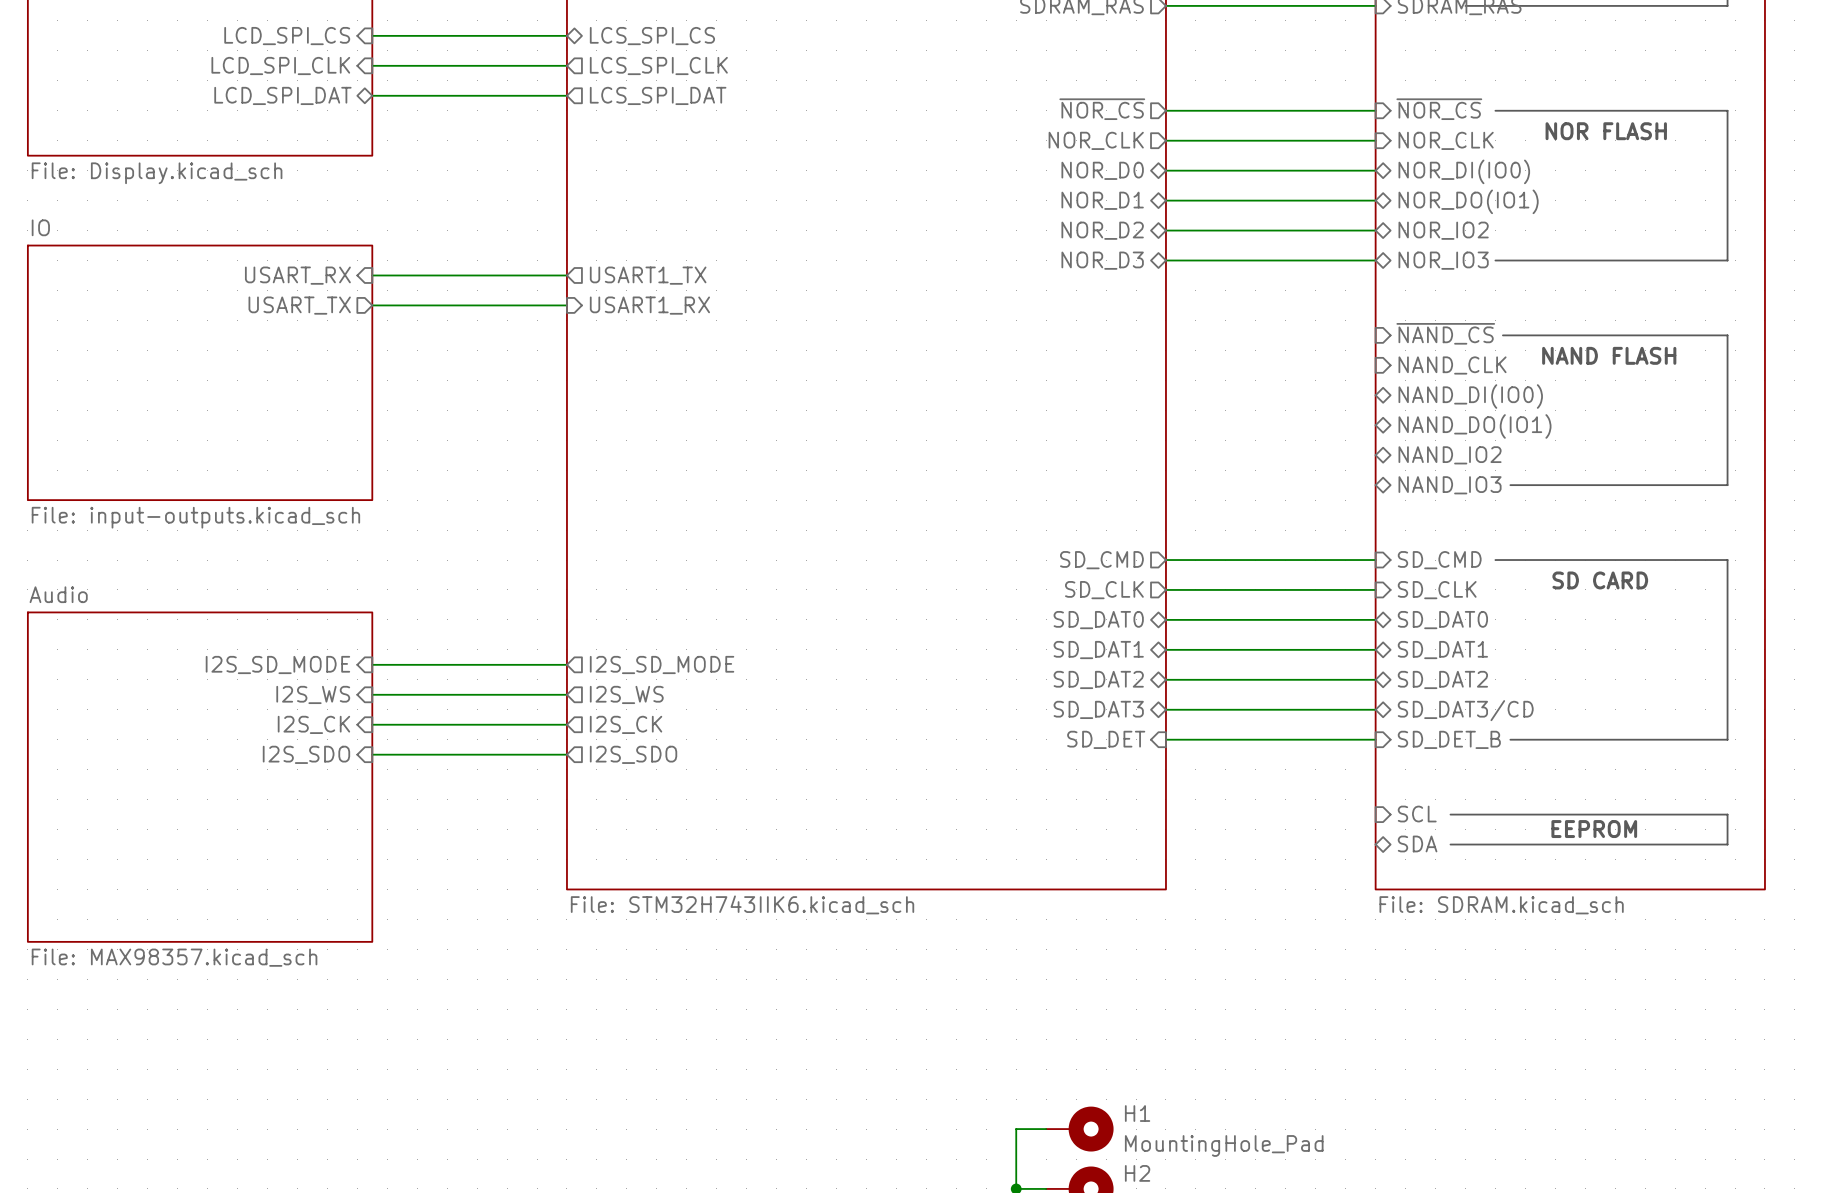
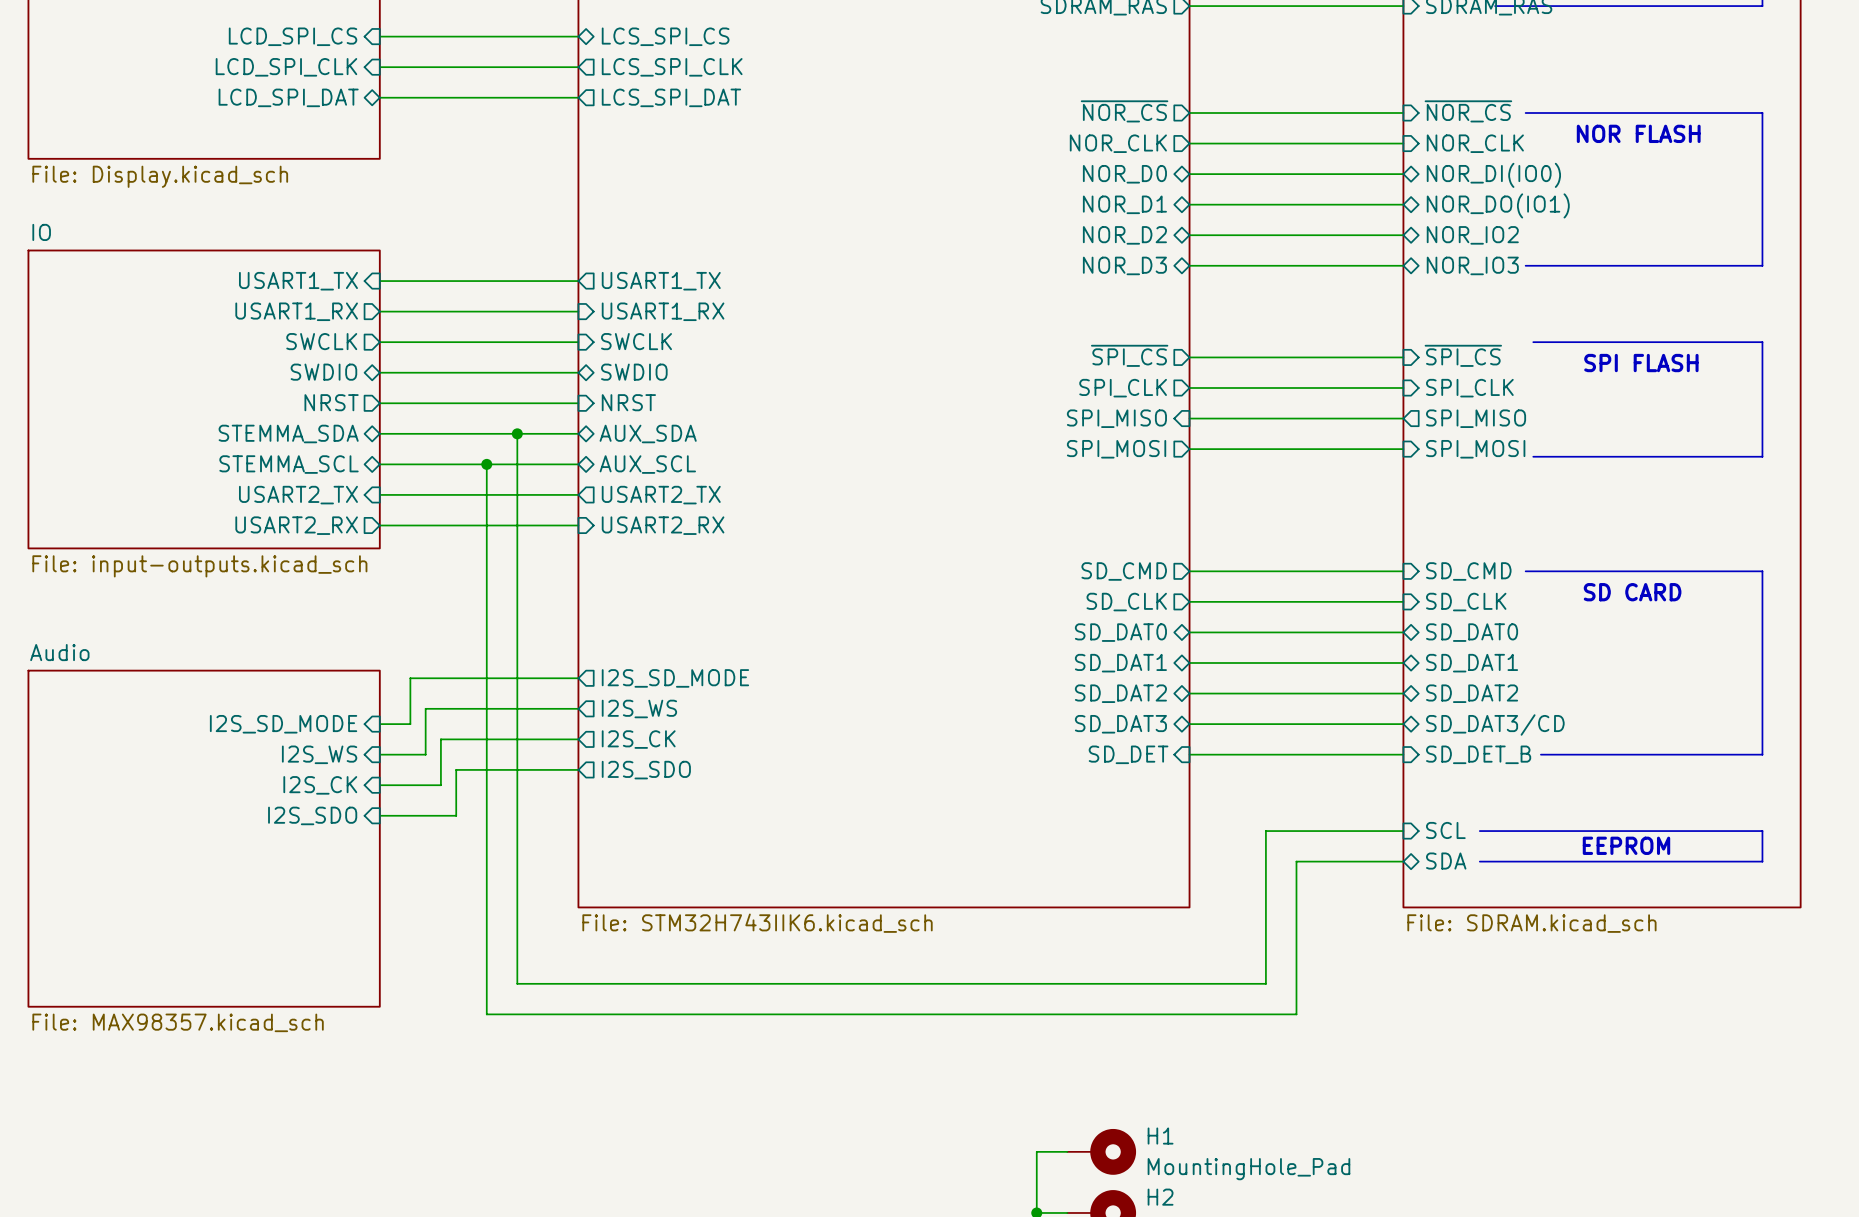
sheet pin: USART_RX (297, 275) -> USART1_TX (298, 281)
sheet pin: USART_TX (299, 305) -> USART1_RX (296, 311)
sheet pin: ~{NAND_CS} (1445, 333) -> ~{SPI_CS} (1463, 355)
sheet pin: none -> SWCLK (321, 341)
sheet pin: none -> SWCLK (636, 341)
wire: none -> (379, 342) (578, 342)
sheet pin: none -> ~{SPI_CS} (1129, 355)
wire: none -> (1189, 357) (1403, 357)
text: NAND FLASH (1609, 355) -> SPI FLASH (1641, 363)
sheet pin: none -> SWDIO (323, 372)
sheet pin: none -> SWDIO (634, 372)
wire: none -> (379, 372) (578, 372)
sheet pin: NAND_CLK (1452, 365) -> none
sheet IO: File: input-outputs.kicad_sch (200, 372) -> none
sheet pin: none -> SPI_CLK (1123, 388)
wire: none -> (1189, 387) (1403, 387)
sheet pin: none -> SPI_CLK (1469, 388)
sheet IO: none -> File: input-outputs.kicad_sch (204, 399)
sheet pin: none -> NRST (331, 402)
sheet pin: none -> NRST (628, 402)
wire: none -> (379, 403) (578, 403)
sheet pin: NAND_DI(IO0) (1470, 396) -> none
sheet pin: none -> SPI_MISO (1116, 418)
wire: none -> (1189, 418) (1403, 418)
sheet pin: none -> SPI_MISO (1476, 418)
sheet pin: none -> STEMMA_SDA (288, 433)
wire: none -> (379, 433) (578, 433)
wire: none -> (517, 433) (517, 983) (1265, 983) (1265, 831) (1403, 831)
junction: none -> (517, 433)
sheet pin: none -> AUX_SDA (648, 433)
sheet pin: NAND_DO(IO1) (1474, 426) -> none
sheet pin: none -> SPI_MOSI (1116, 449)
wire: none -> (1189, 449) (1403, 449)
sheet pin: none -> SPI_MOSI (1475, 449)
line: (1727, 447) (1727, 485) (1510, 485) -> (1762, 456) (1533, 456)
sheet pin: none -> STEMMA_SCL (289, 464)
wire: none -> (379, 464) (578, 464)
wire: none -> (486, 464) (486, 1014) (1296, 1014) (1296, 861) (1403, 861)
junction: none -> (486, 464)
sheet pin: none -> AUX_SCL (647, 464)
sheet pin: NAND_IO2 (1450, 455) -> none
sheet pin: none -> USART2_TX (298, 495)
wire: none -> (379, 494) (578, 494)
sheet pin: none -> USART2_TX (661, 495)
sheet pin: NAND_IO3 (1450, 485) -> none
sheet pin: none -> USART2_RX (296, 525)
wire: none -> (379, 525) (578, 525)
sheet pin: none -> USART2_RX (663, 525)
sheet pin position: I2S_SD_MODE (277, 664) -> I2S_SD_MODE (283, 724)
wire: (372, 664) (402, 664) -> (379, 724) (410, 724) (410, 678)
sheet pin position: I2S_WS (313, 694) -> I2S_WS (319, 754)
wire: (372, 694) (417, 694) -> (379, 754) (425, 754) (425, 708)
sheet pin position: I2S_CK (313, 724) -> I2S_CK (320, 785)
wire: (372, 724) (432, 724) -> (379, 785) (440, 785) (440, 739)
sheet pin position: I2S_SDO (306, 754) -> I2S_SDO (312, 815)
wire: (372, 754) (447, 754) -> (379, 815) (456, 815) (456, 769)
sheet Audio position: (200, 777) -> (204, 838)

